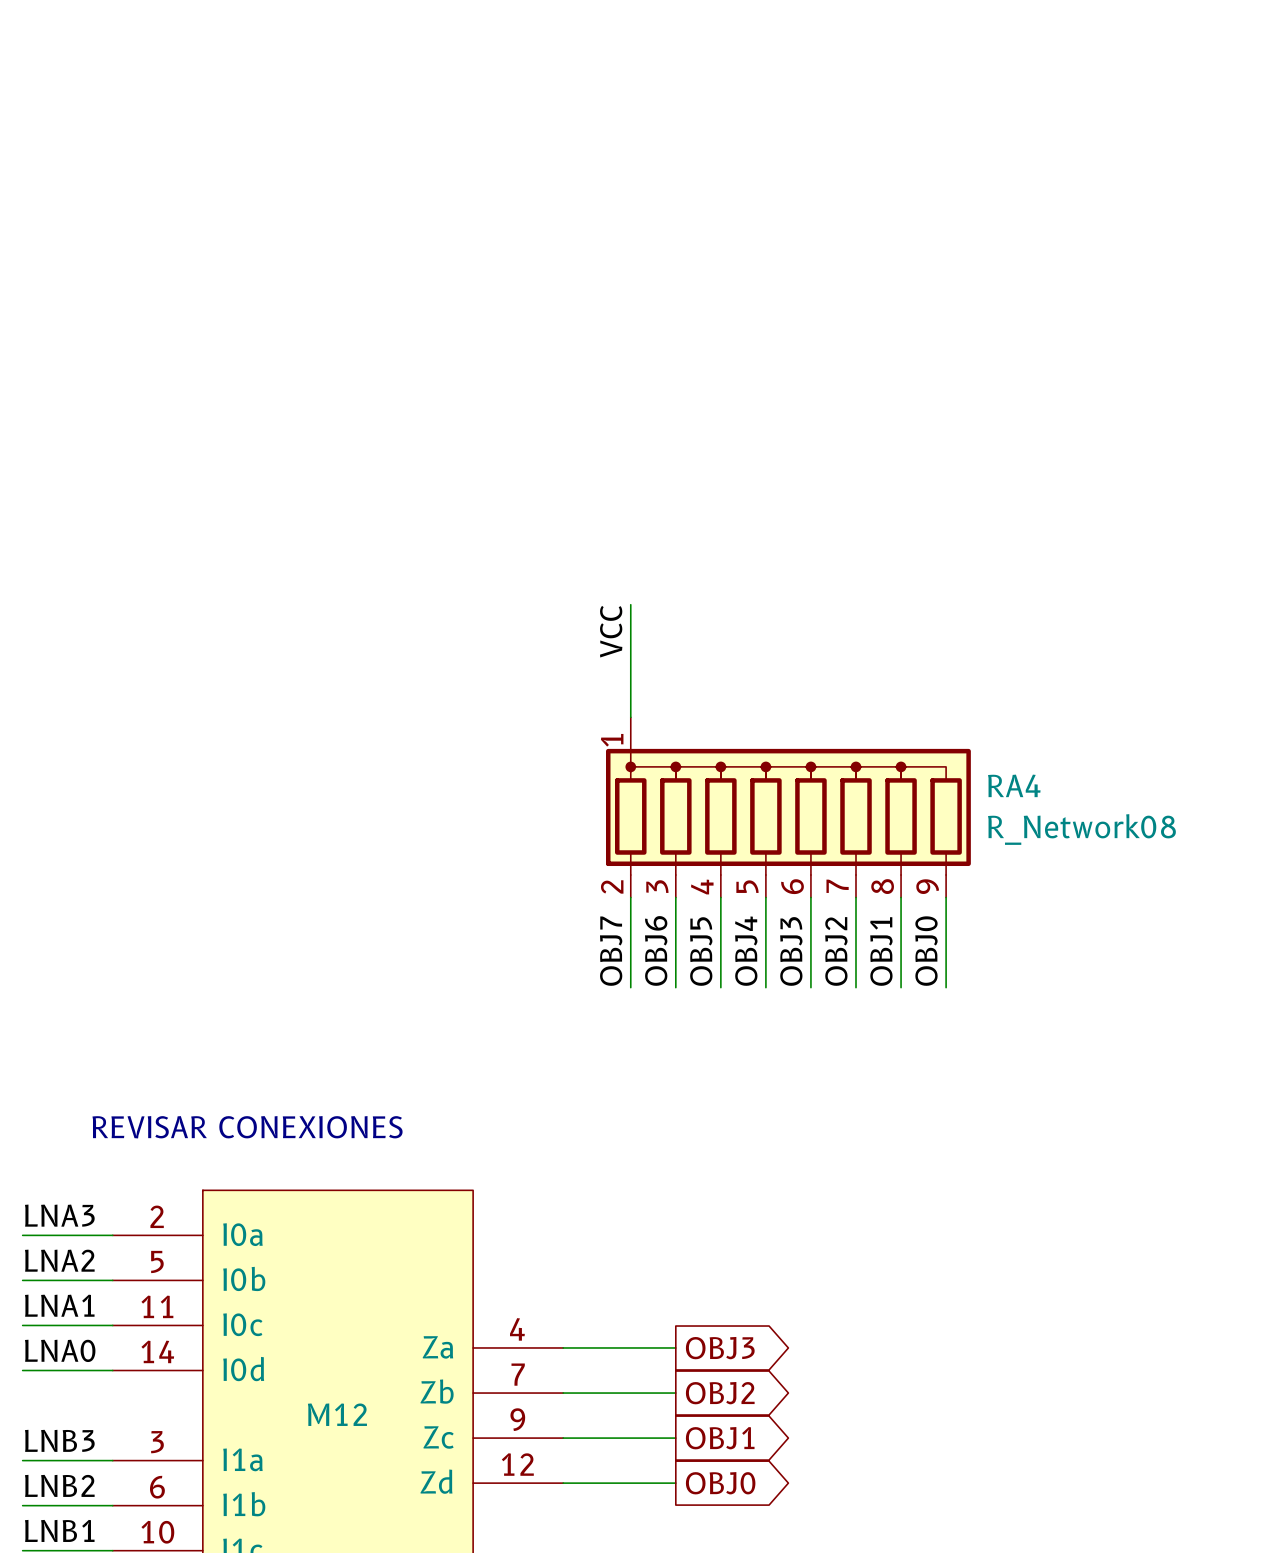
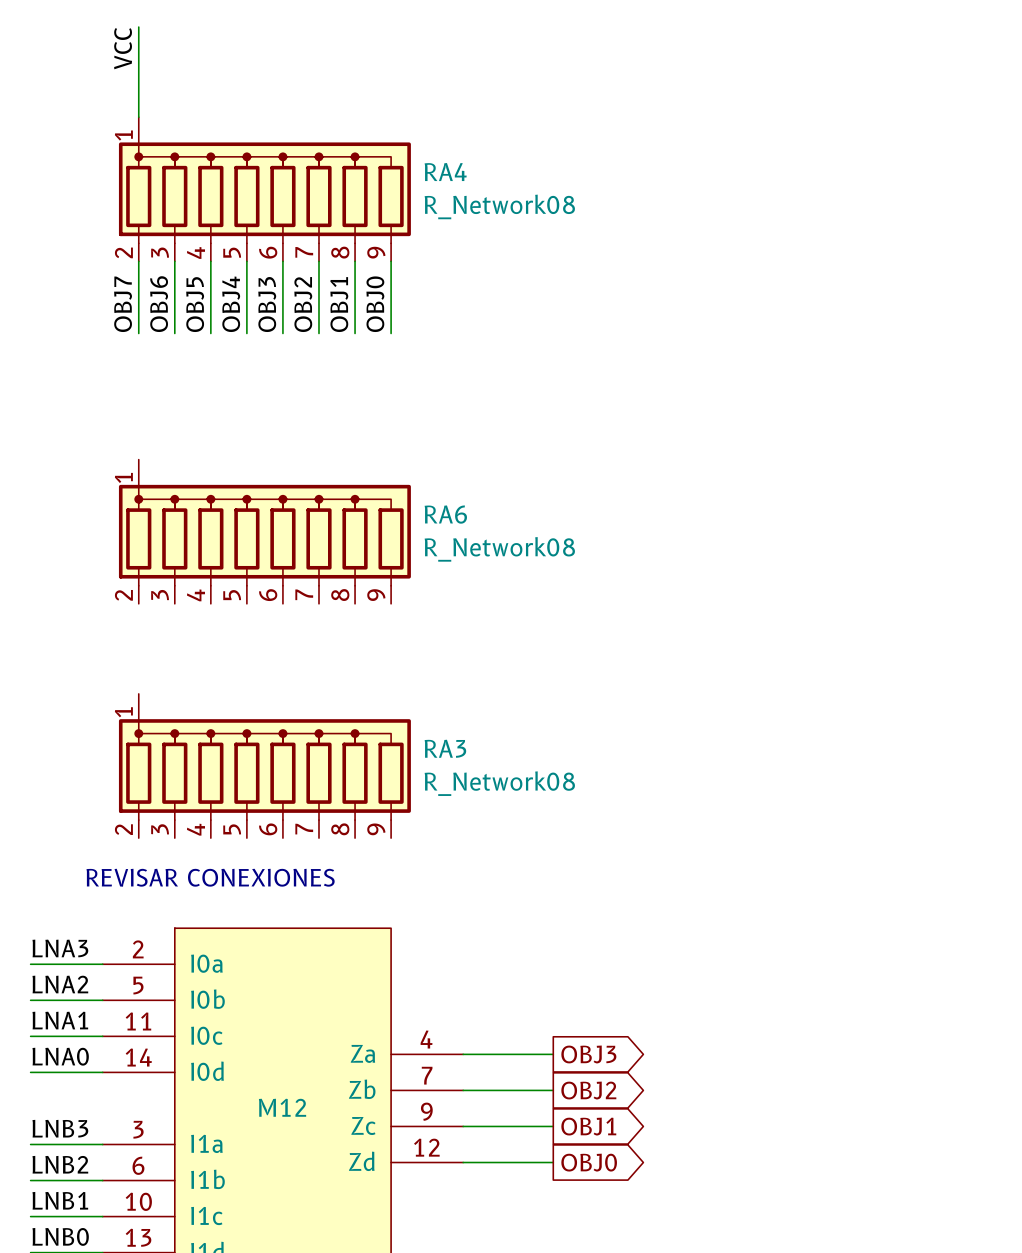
wire: none -> (138, 27) (138, 117)
label: none -> VCC (123, 48)
wire: none -> (138, 261) (138, 333)
wire: none -> (174, 261) (174, 333)
wire: none -> (210, 261) (210, 333)
wire: none -> (246, 261) (246, 333)
wire: none -> (282, 261) (282, 333)
wire: none -> (318, 261) (318, 333)
wire: none -> (355, 261) (355, 333)
wire: none -> (391, 261) (391, 333)
label: none -> OBJ7 (123, 304)
label: none -> OBJ6 (159, 304)
label: none -> OBJ5 (195, 304)
label: none -> OBJ4 (231, 304)
label: none -> OBJ3 (267, 304)
label: none -> OBJ2 (303, 304)
label: none -> OBJ1 (339, 304)
label: none -> OBJ0 (375, 304)
wire: (630, 604) (630, 717) -> none
label: VCC (611, 631) -> none
RA6: none -> R_Network08 (264, 531)
RA4 position: (788, 807) -> (264, 189)
wire: (630, 897) (630, 987) -> none
wire: (675, 897) (675, 987) -> none
wire: (720, 897) (720, 987) -> none
wire: (765, 897) (765, 987) -> none
wire: (810, 897) (810, 987) -> none
wire: (855, 897) (855, 987) -> none
wire: (901, 897) (901, 987) -> none
wire: (946, 897) (946, 987) -> none
label: OBJ6 (656, 950) -> none
label: OBJ7 (611, 951) -> none
label: OBJ5 (701, 951) -> none
label: OBJ4 (746, 951) -> none
label: OBJ3 (791, 951) -> none
label: OBJ2 (836, 951) -> none
label: OBJ1 (881, 951) -> none
label: OBJ0 (926, 951) -> none
RA3: none -> R_Network08 (264, 766)

